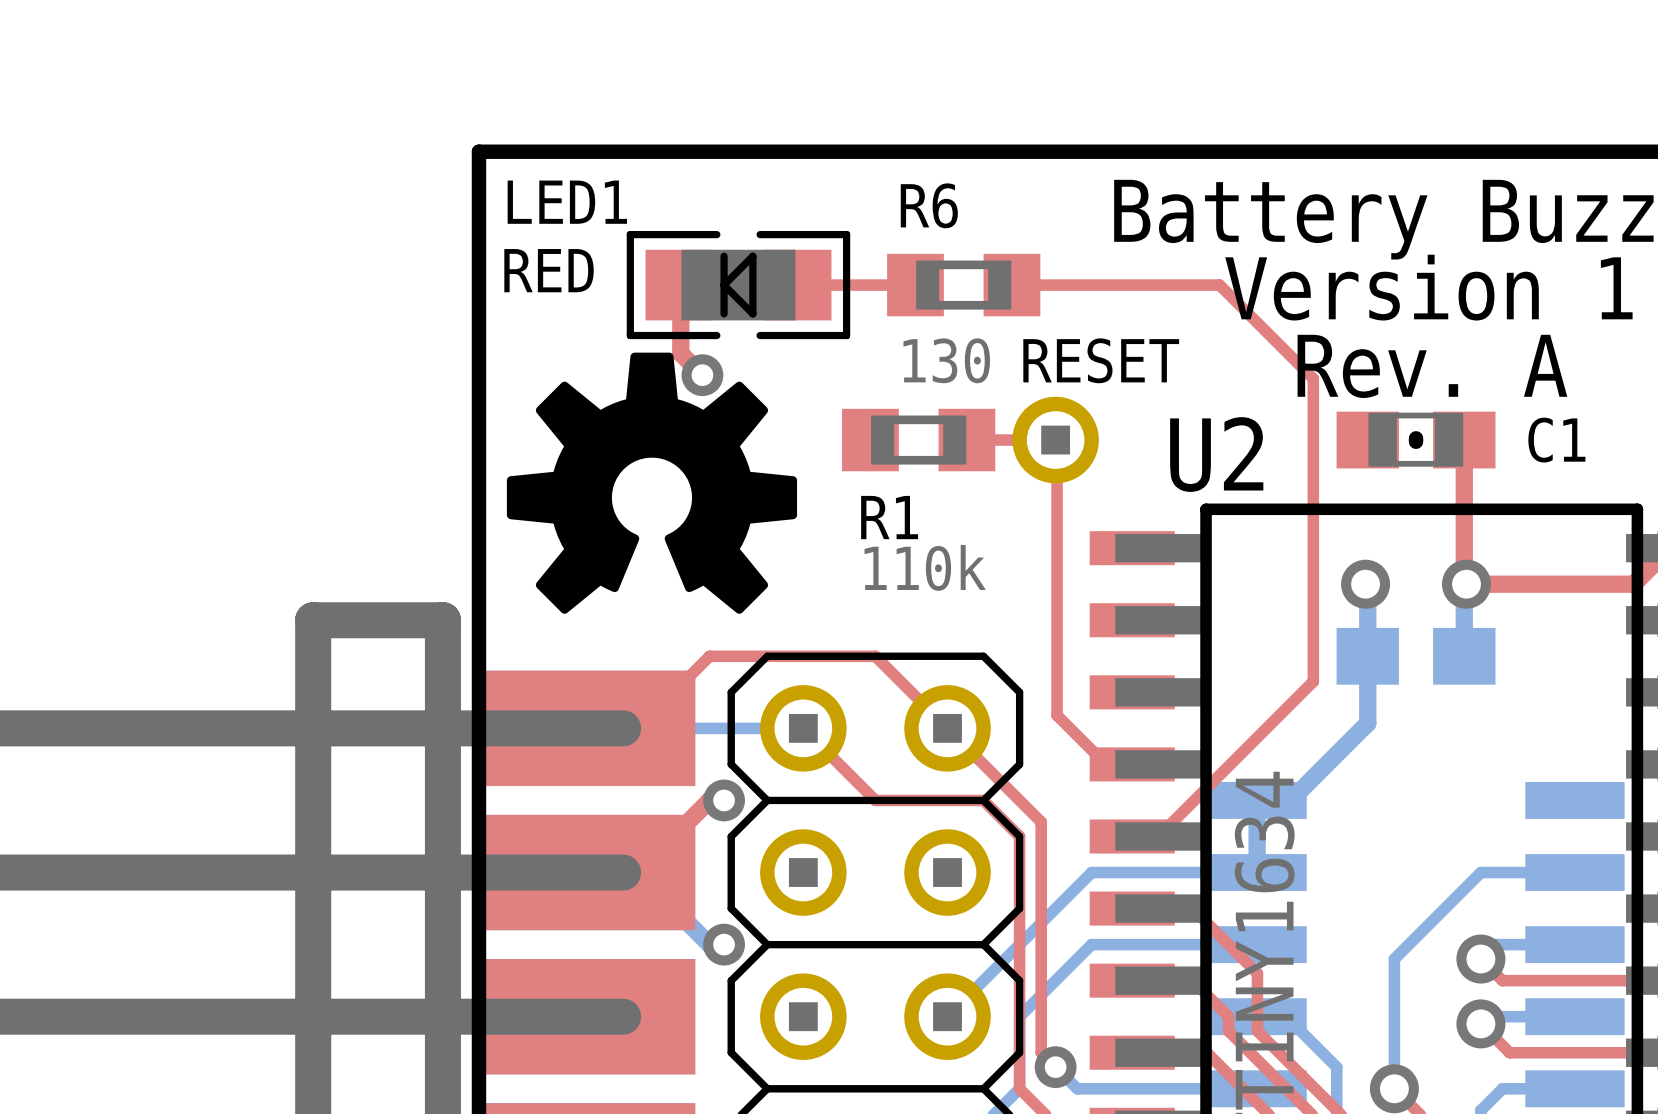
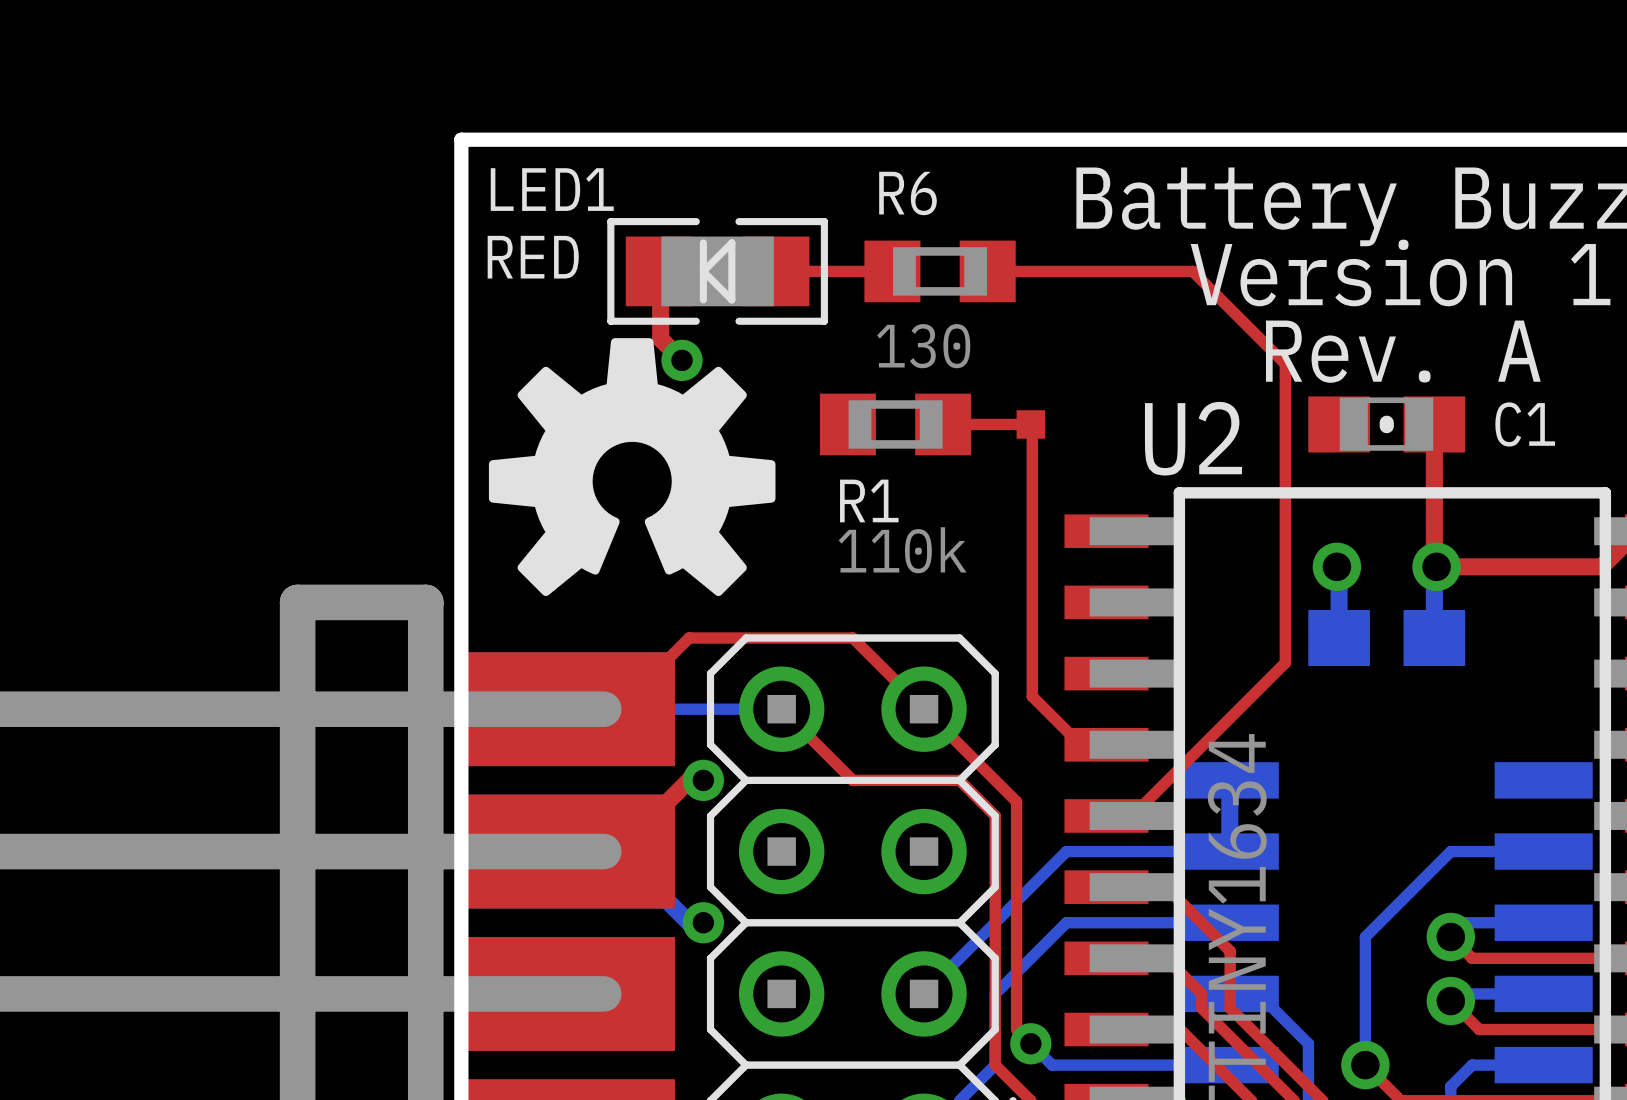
RESET: (1055, 440) -> none
part: none -> (1030, 424)
bottom track: (1367, 656) (1367, 723) (1286, 804) (1261, 804) (1257, 800) -> none

